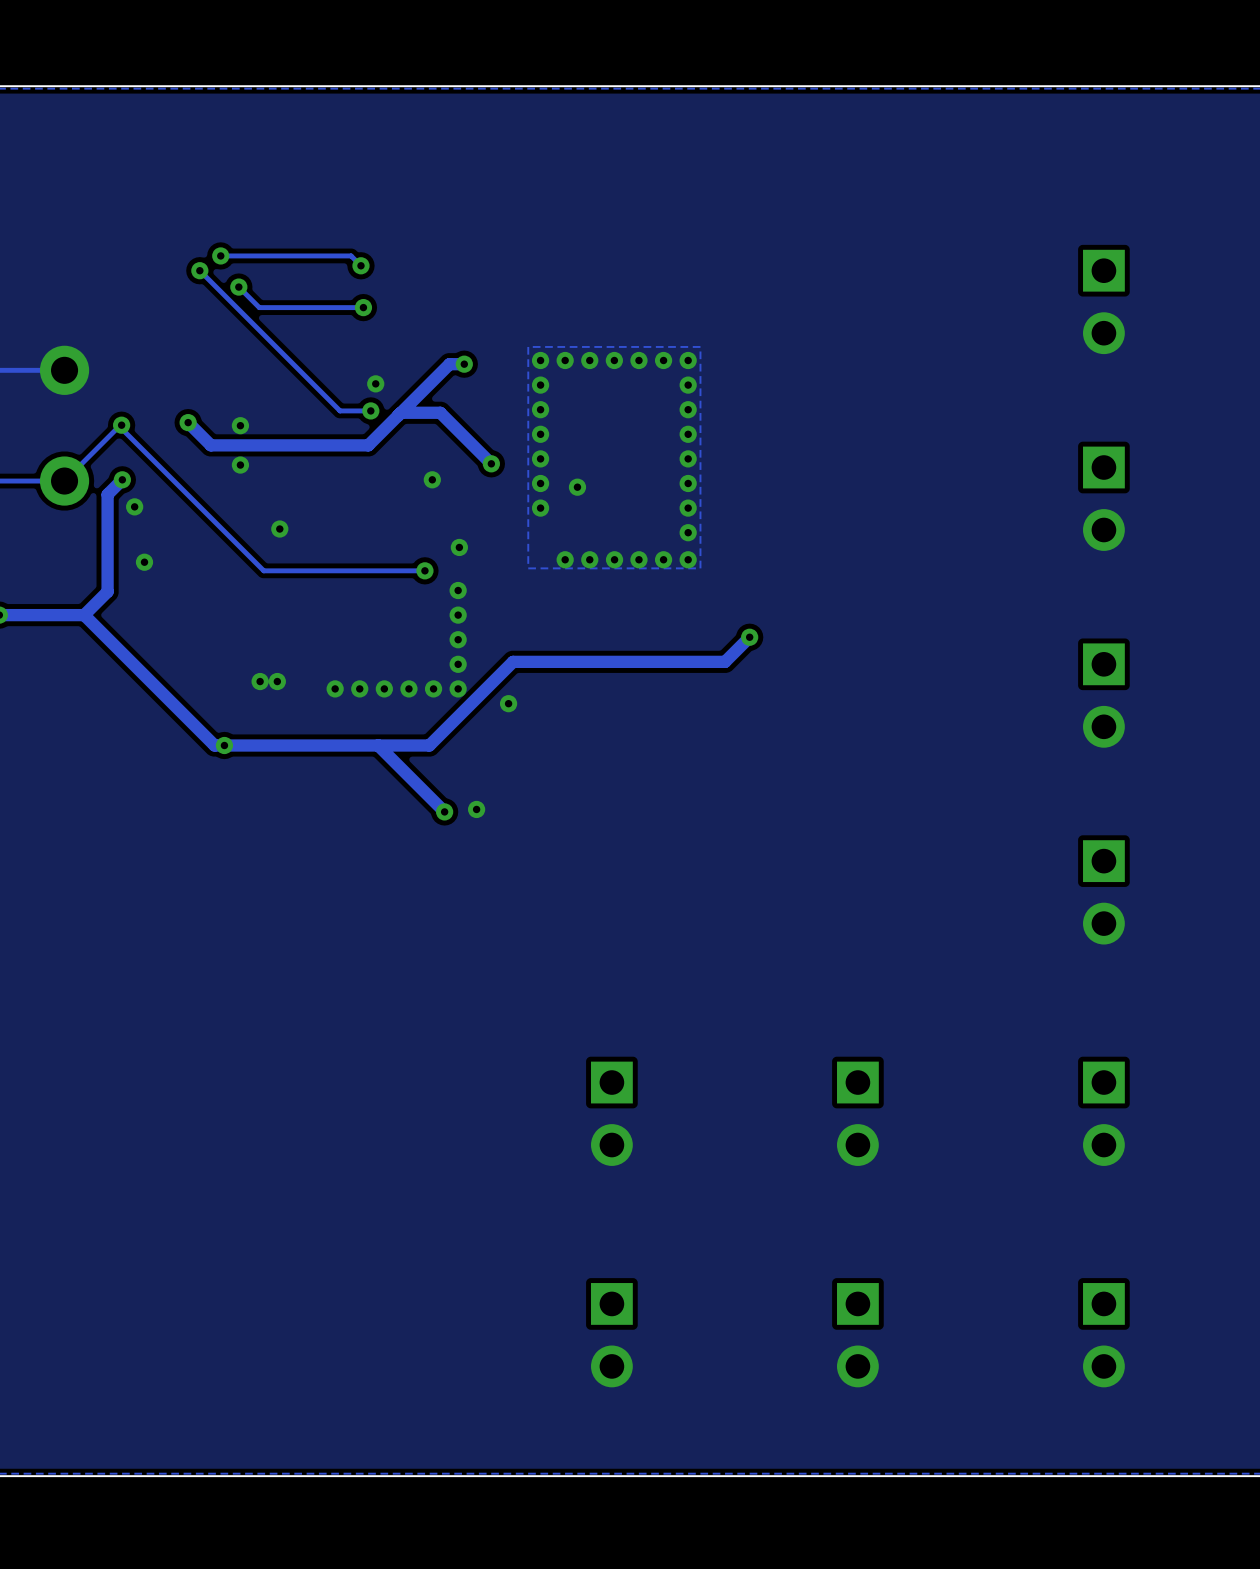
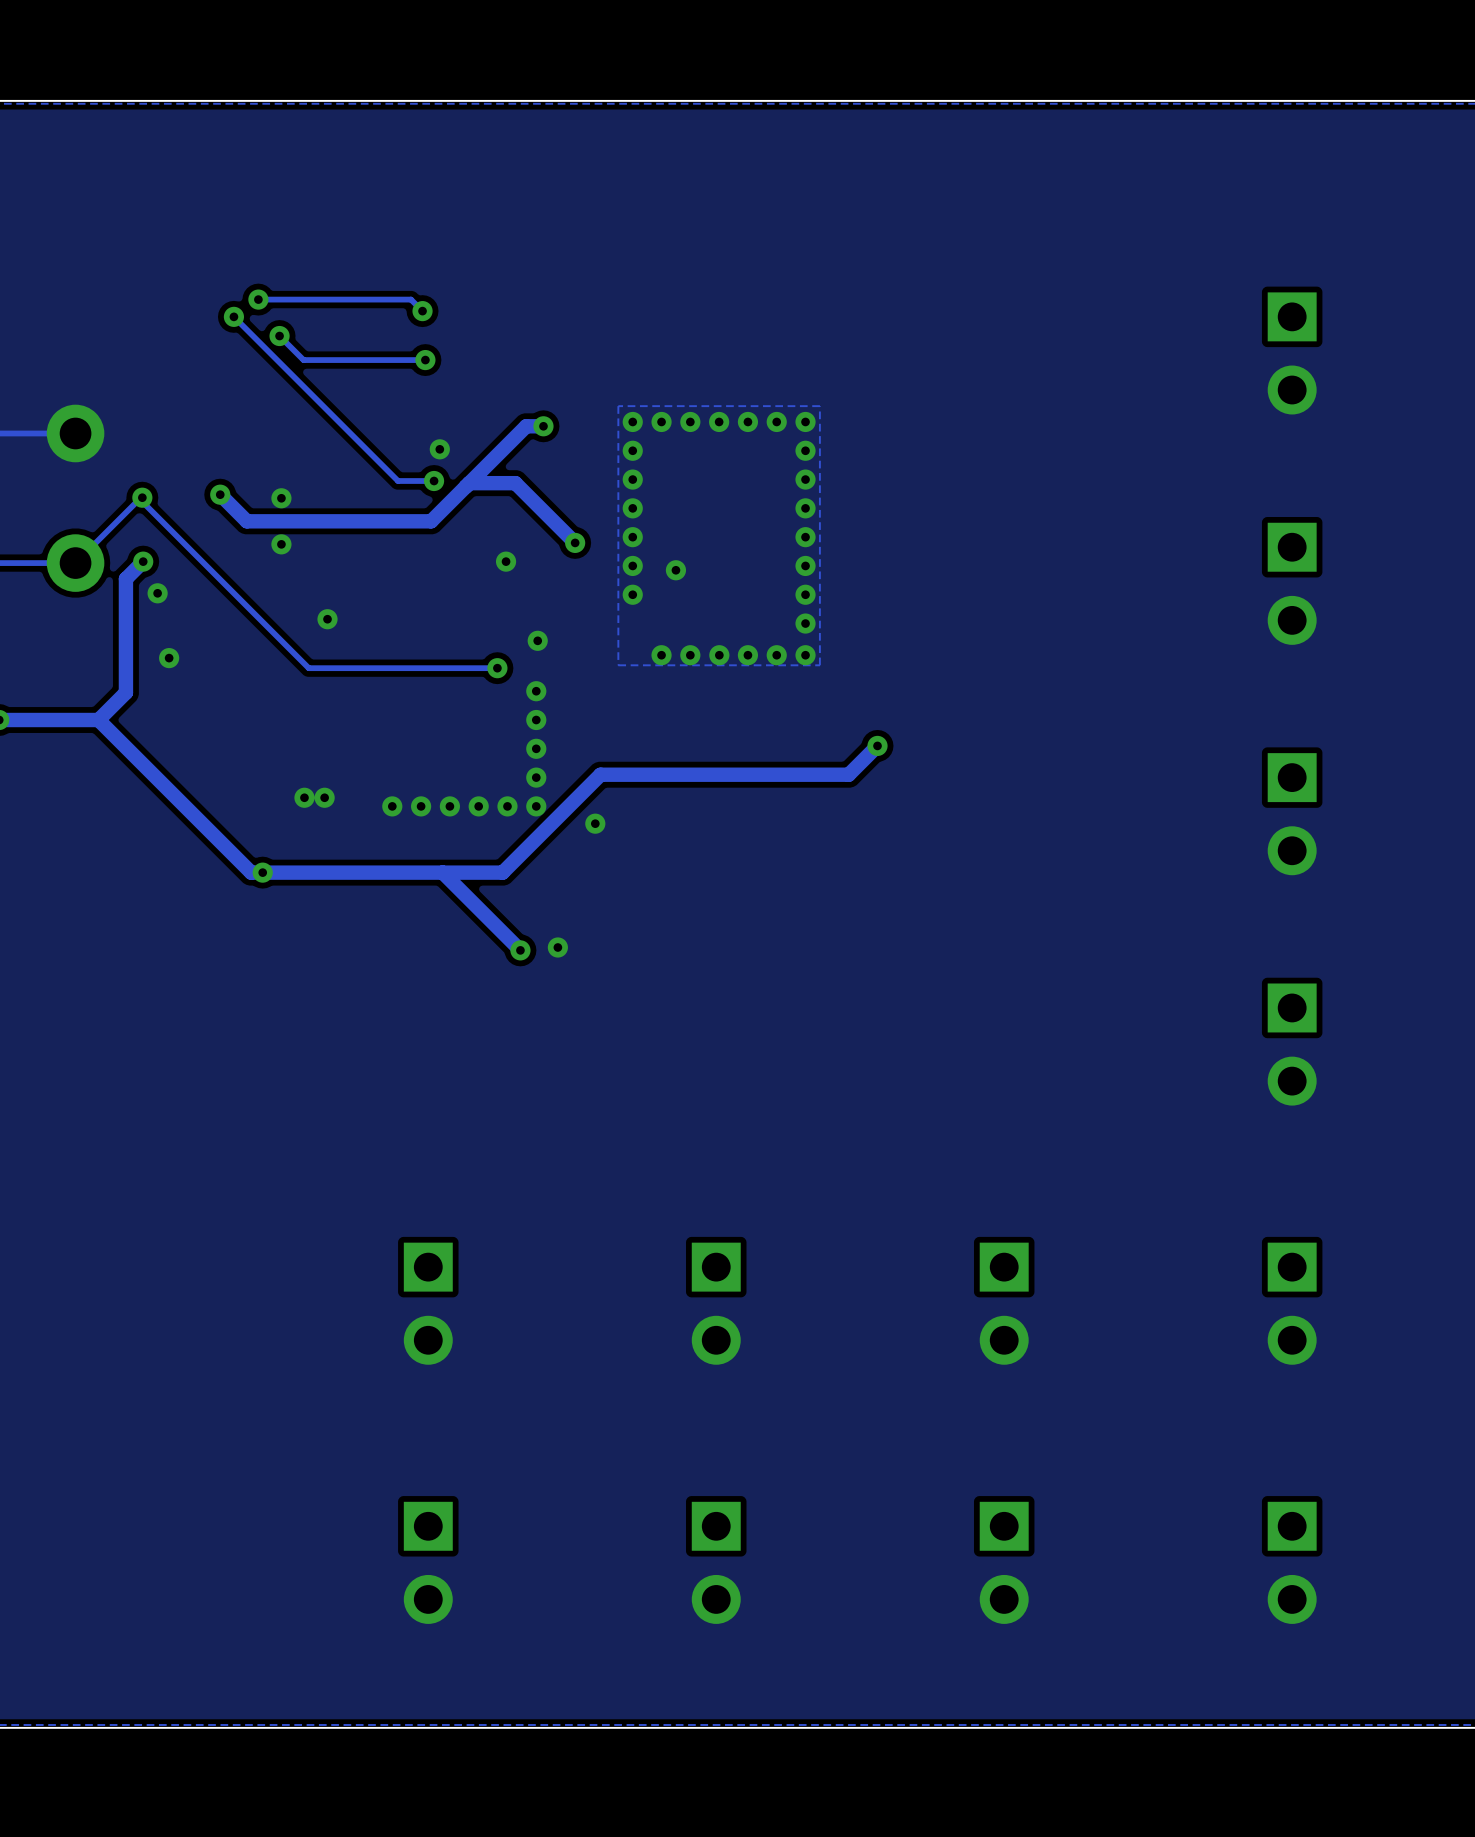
part: none -> (428, 1303)
part: none -> (428, 1562)

